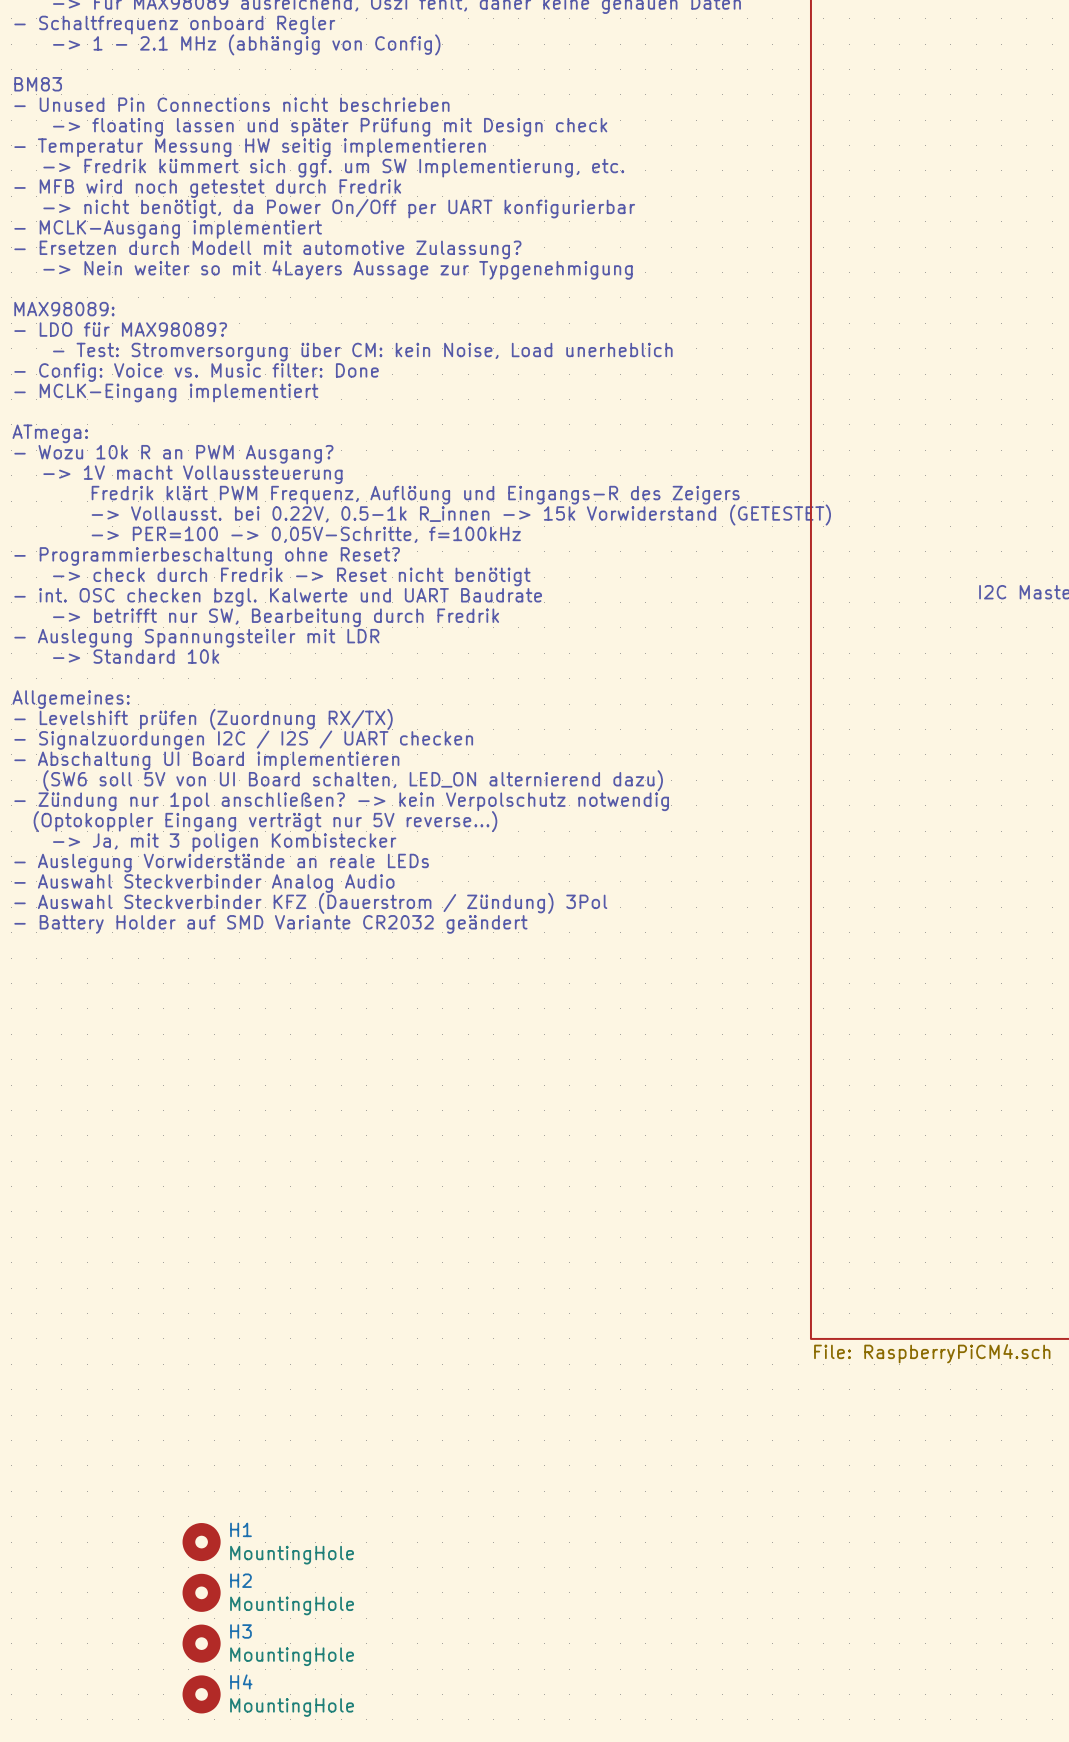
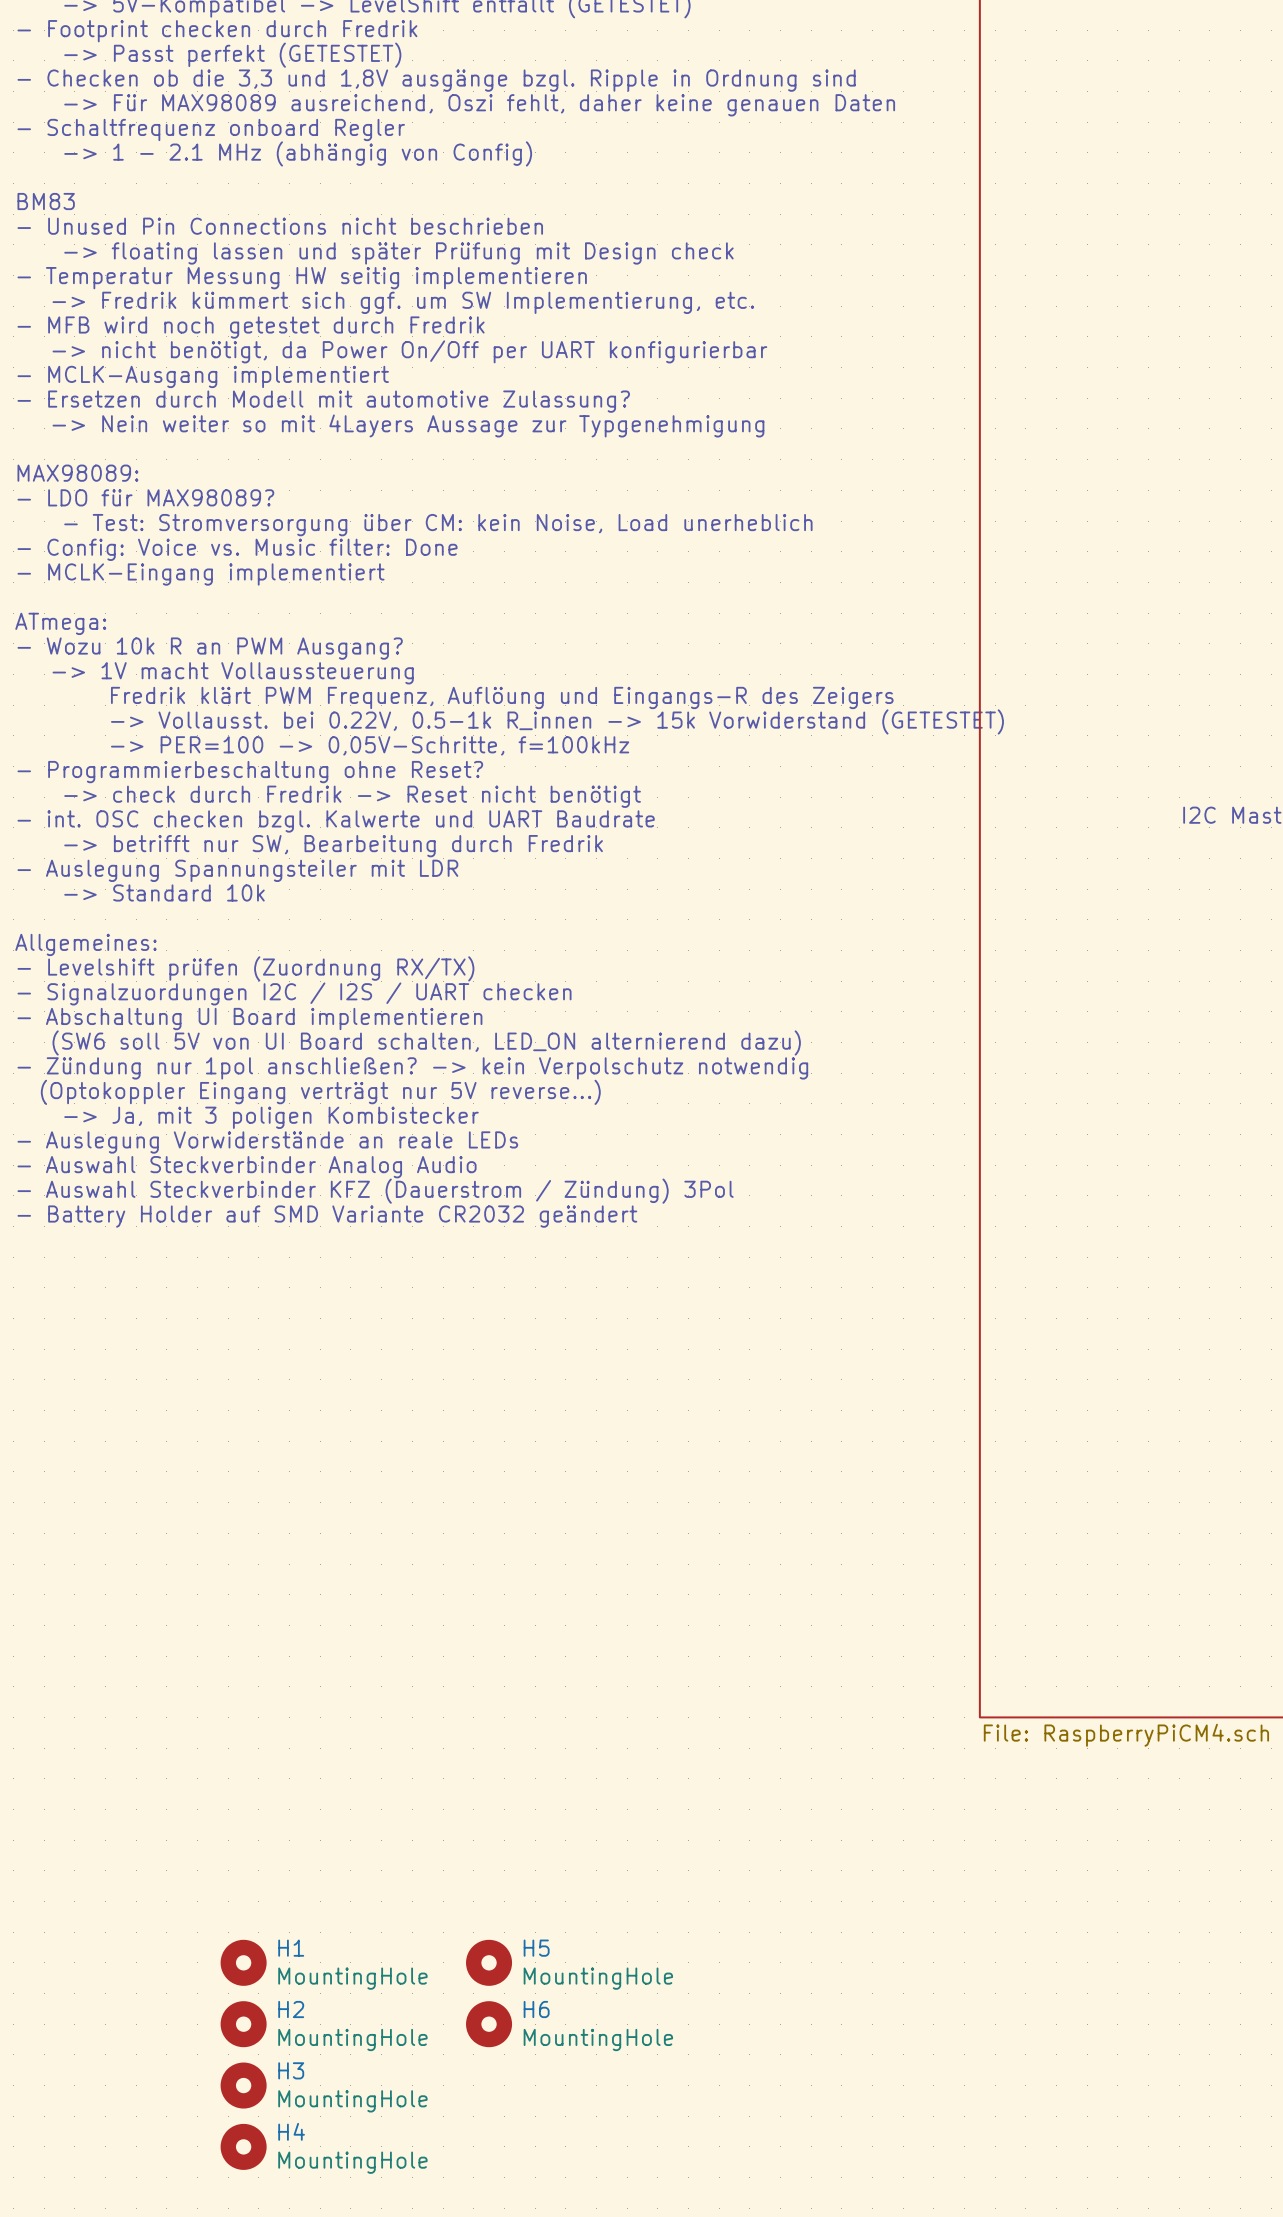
H5: none -> MountingHole (489, 1962)
H6: none -> MountingHole (489, 2024)

